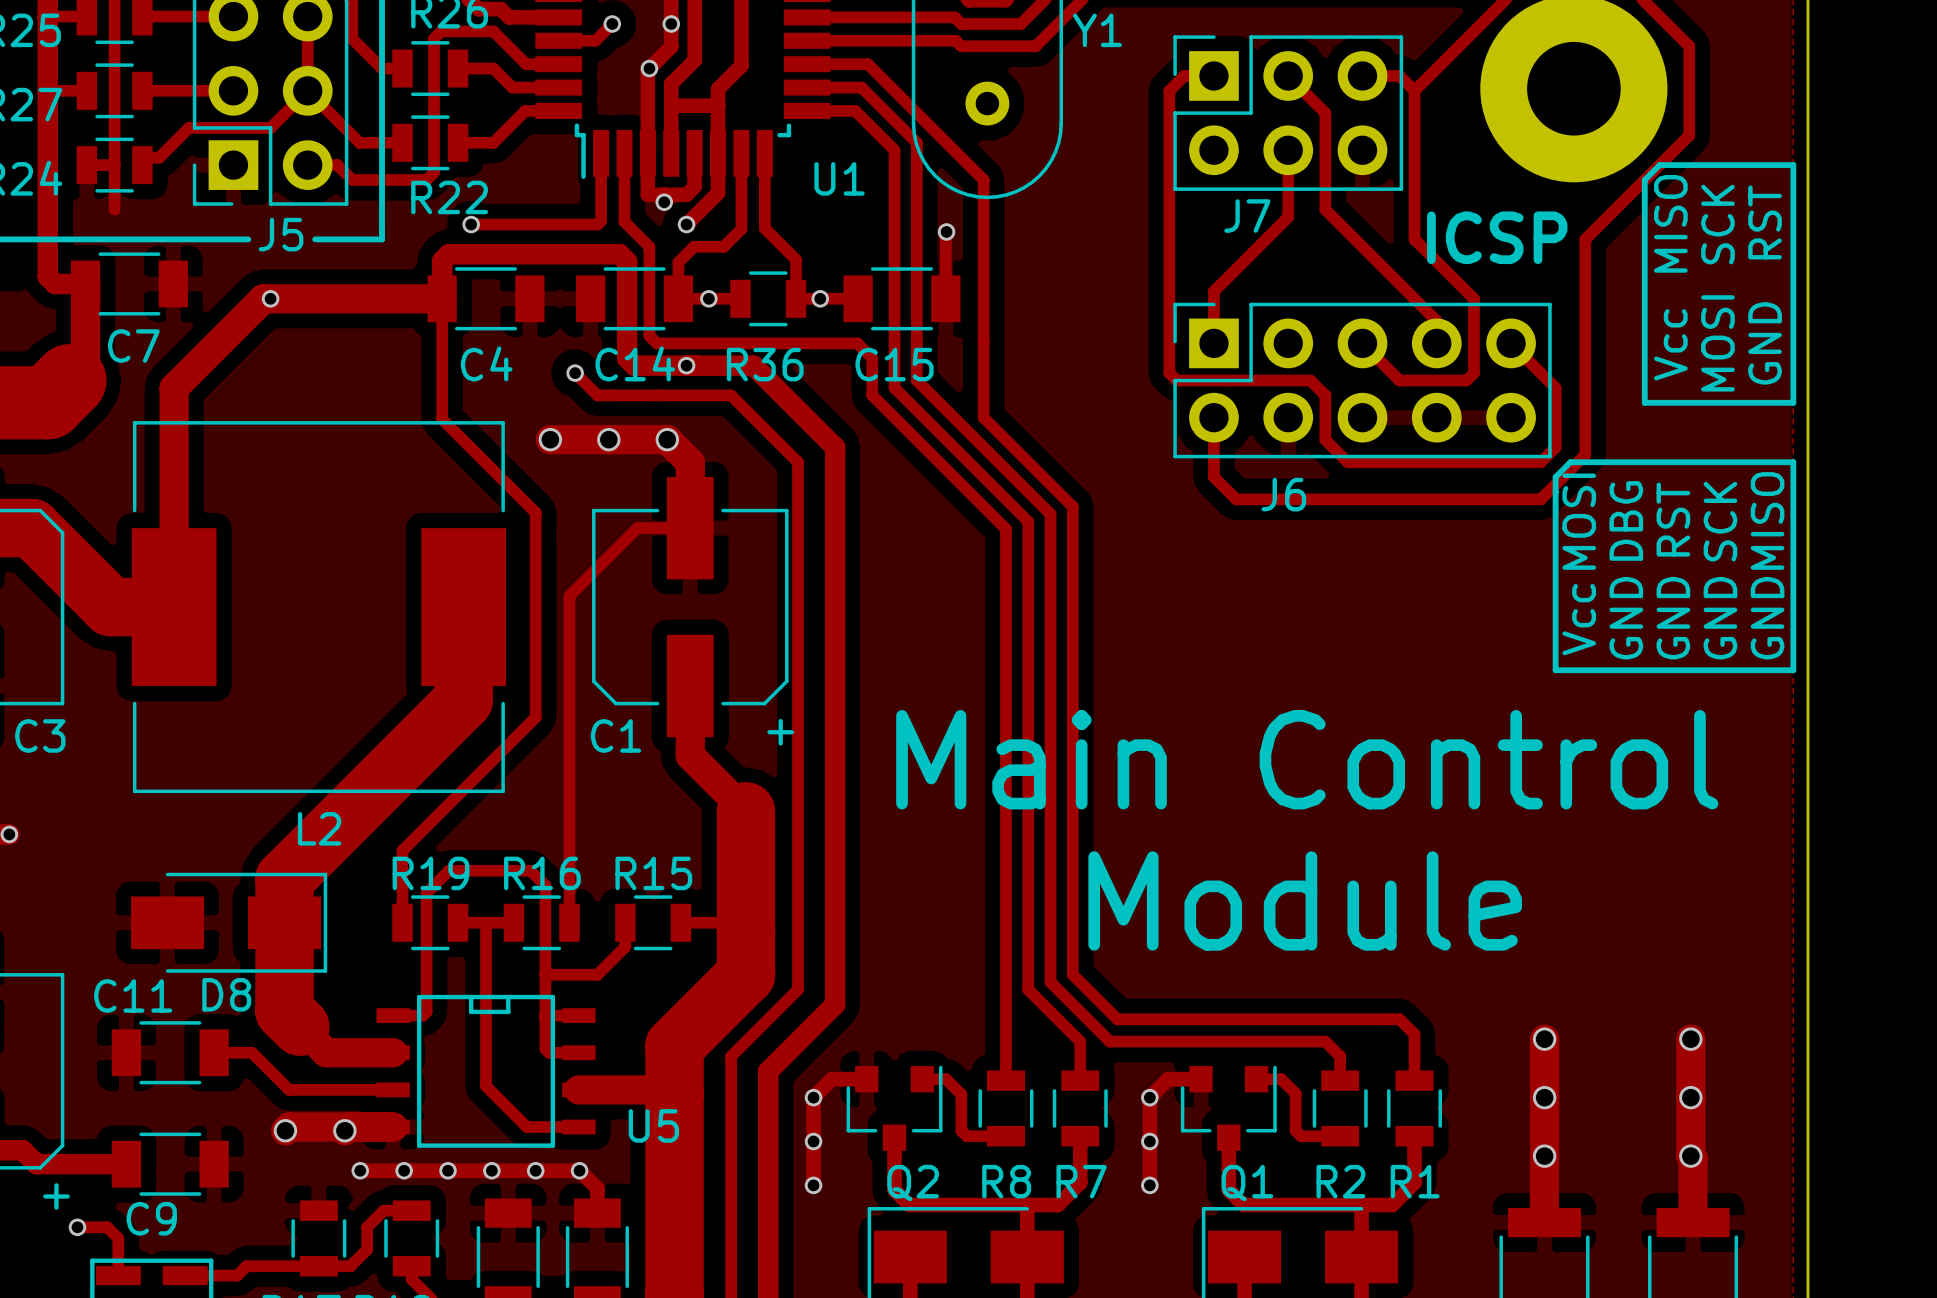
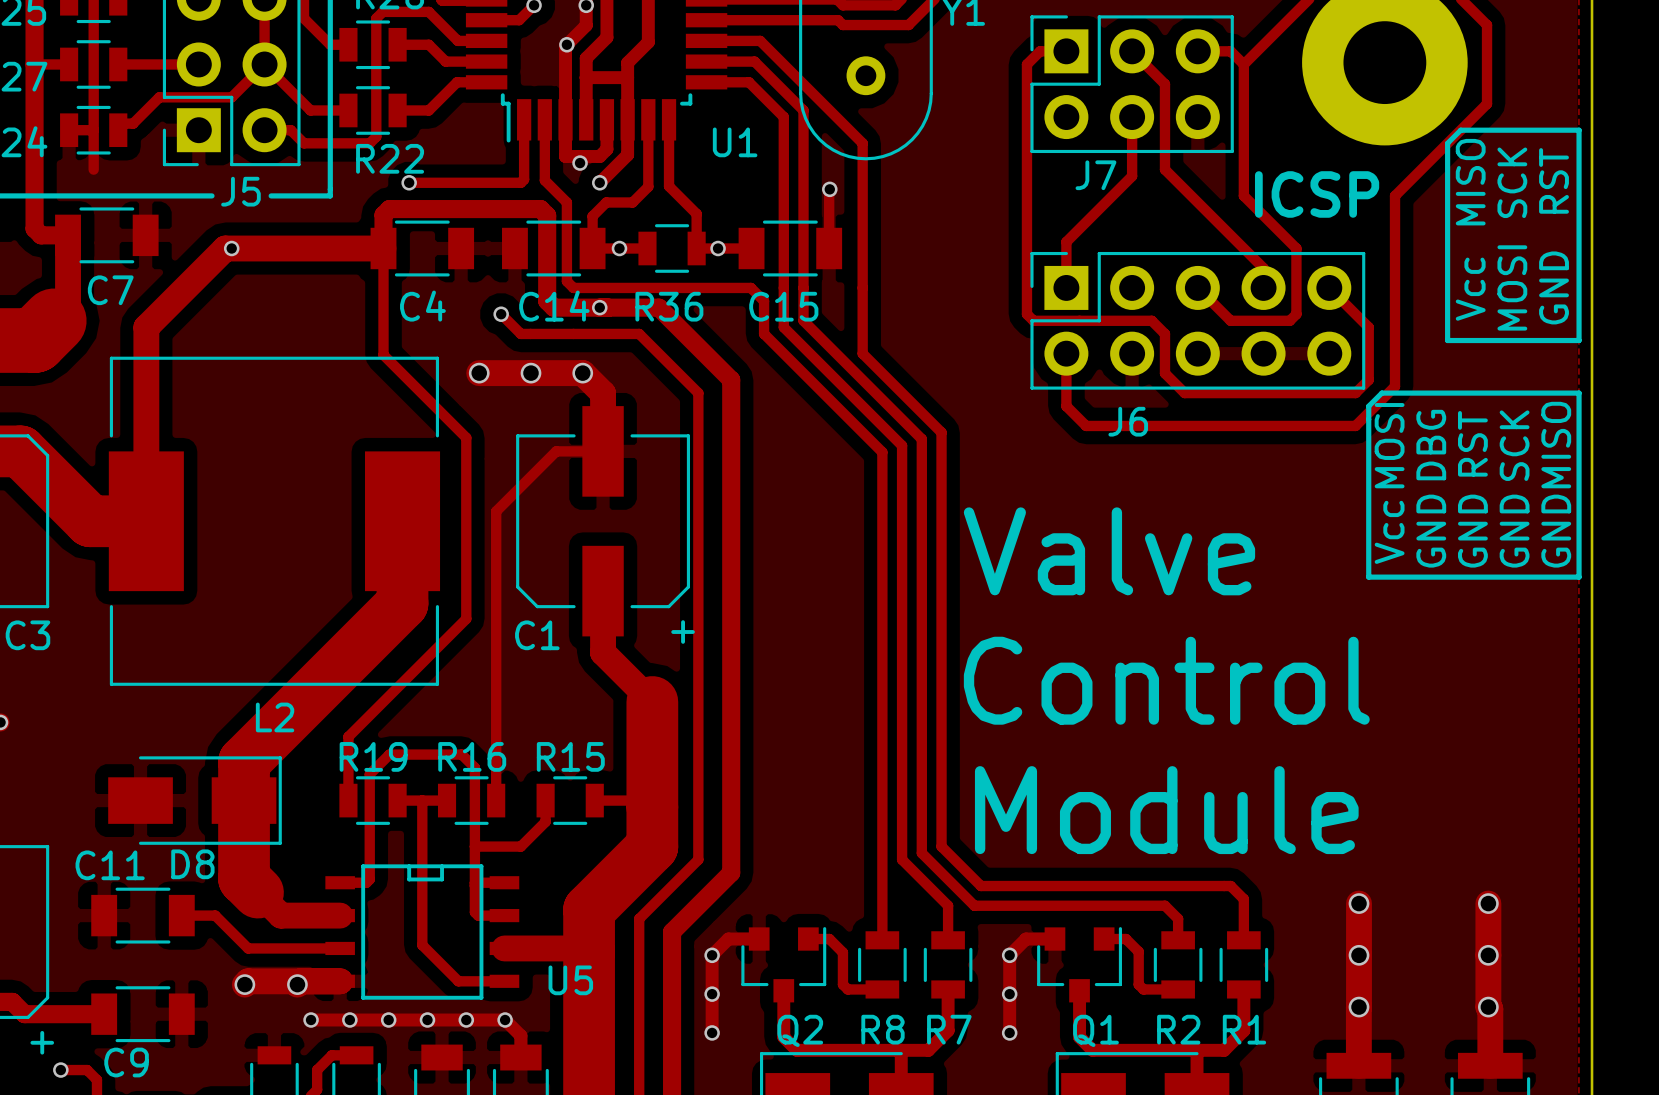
text: none -> Valve (1109, 551)
text: Main Control (1307, 759) -> Control (1166, 680)
text position: Module (1305, 900) -> Module (1166, 810)

